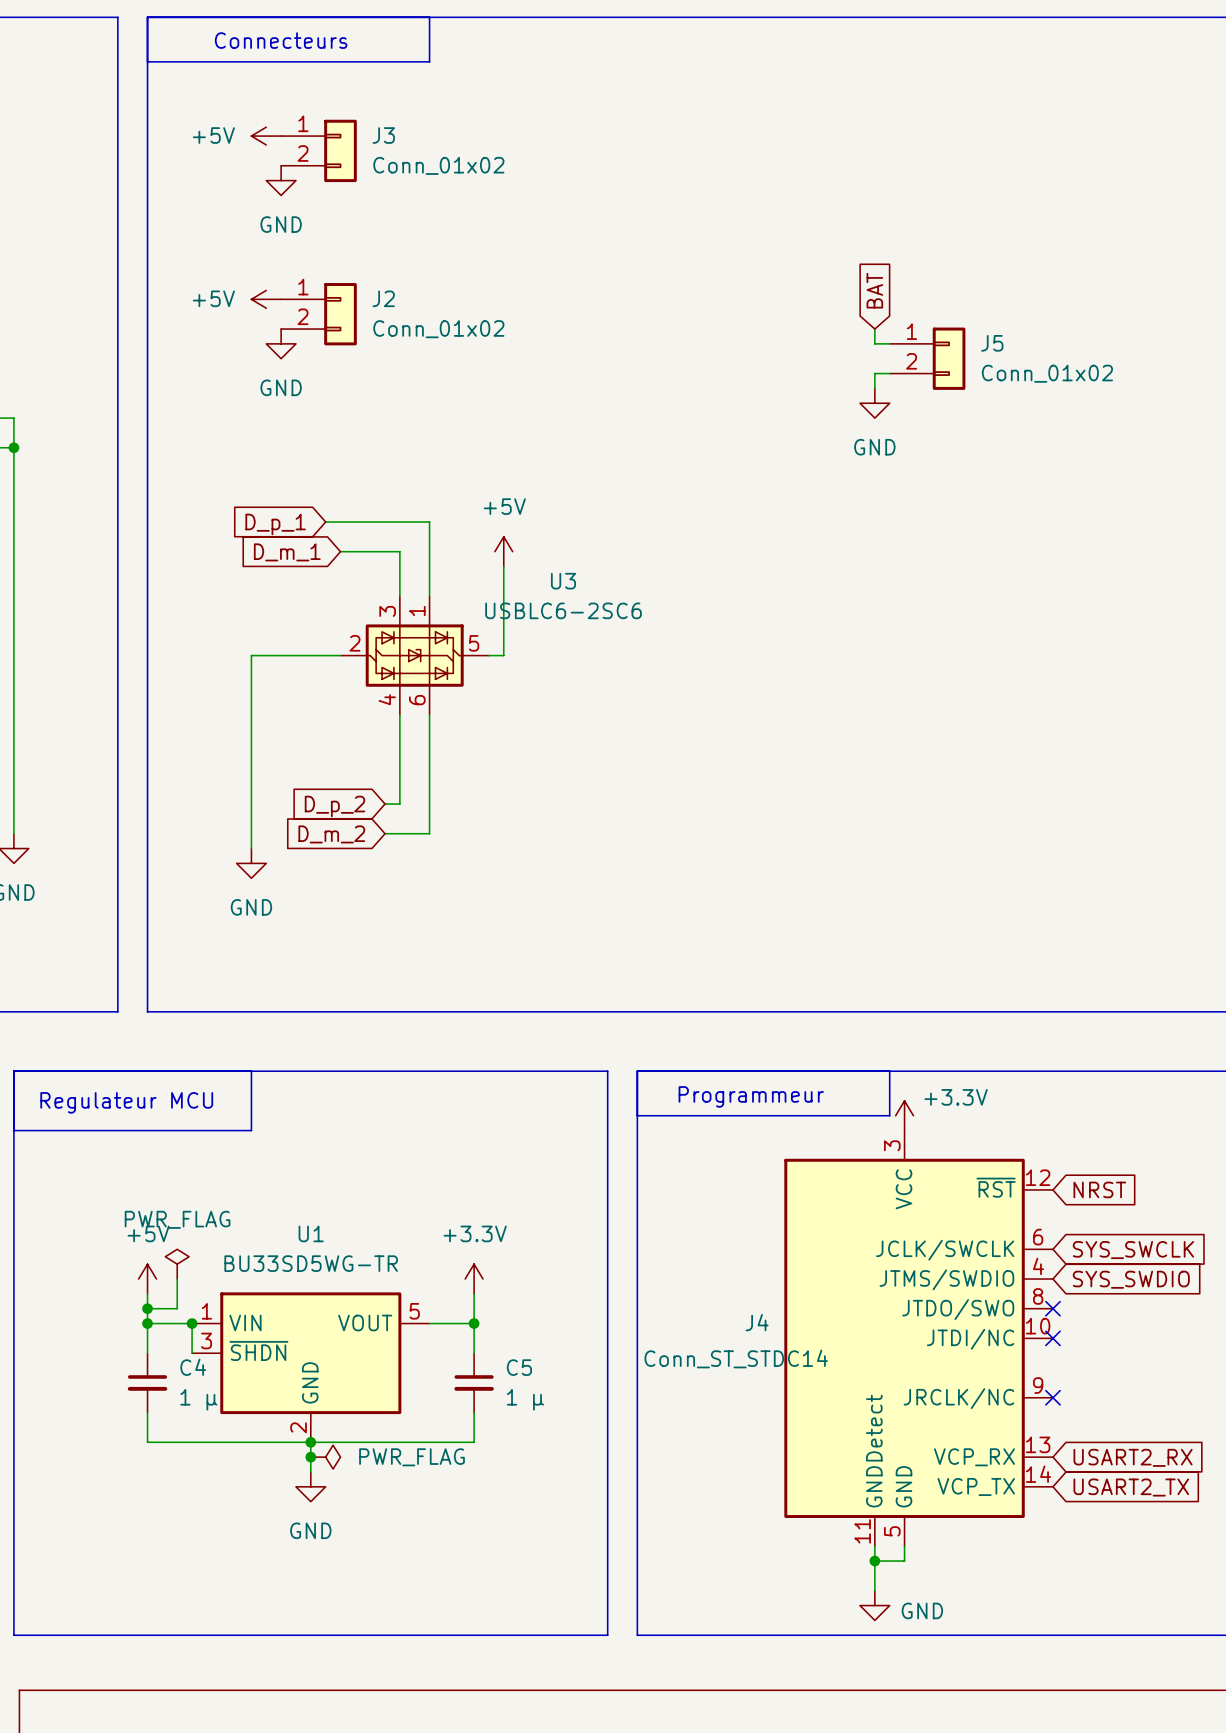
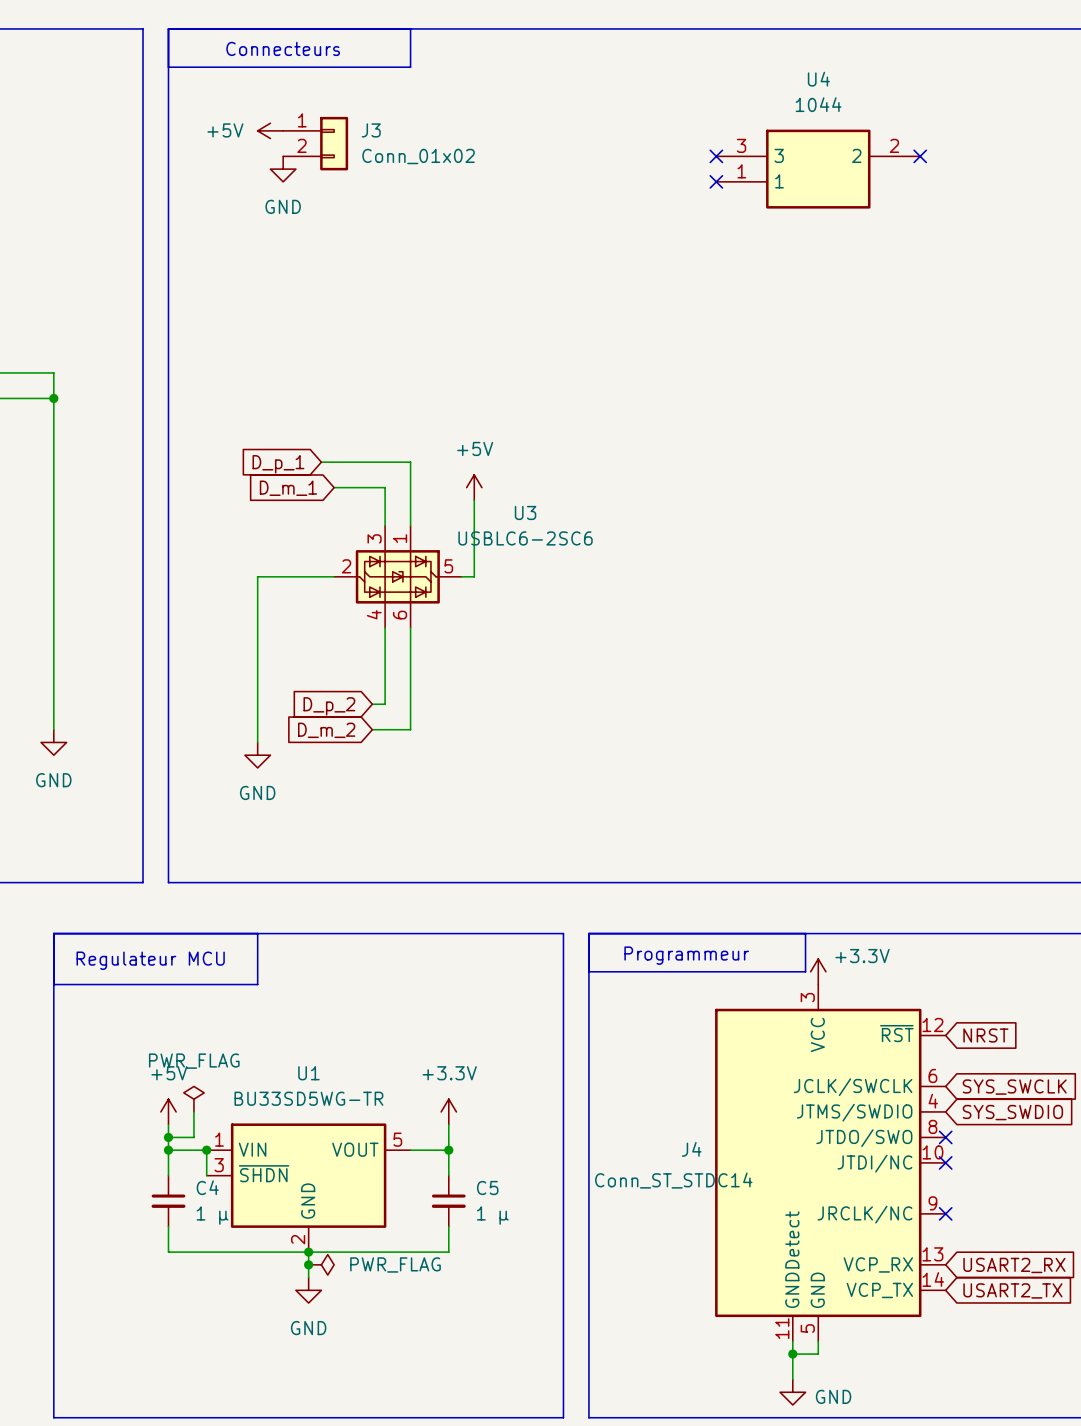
no-connect mark: none -> (716, 156)
no-connect mark: none -> (920, 156)
U4: none -> 1044 (818, 169)
no-connect mark: none -> (716, 181)
global label: BAT (874, 290) -> none
power symbol: +5V (266, 299) -> none
J2: Conn_01x02 (318, 314) -> none
wire: (874, 329) (874, 343) (889, 343) -> none
power symbol: GND (281, 343) -> none
J5: Conn_01x02 (927, 358) -> none
wire: (889, 373) (874, 373) (874, 388) -> none
power symbol: GND (874, 403) -> none

